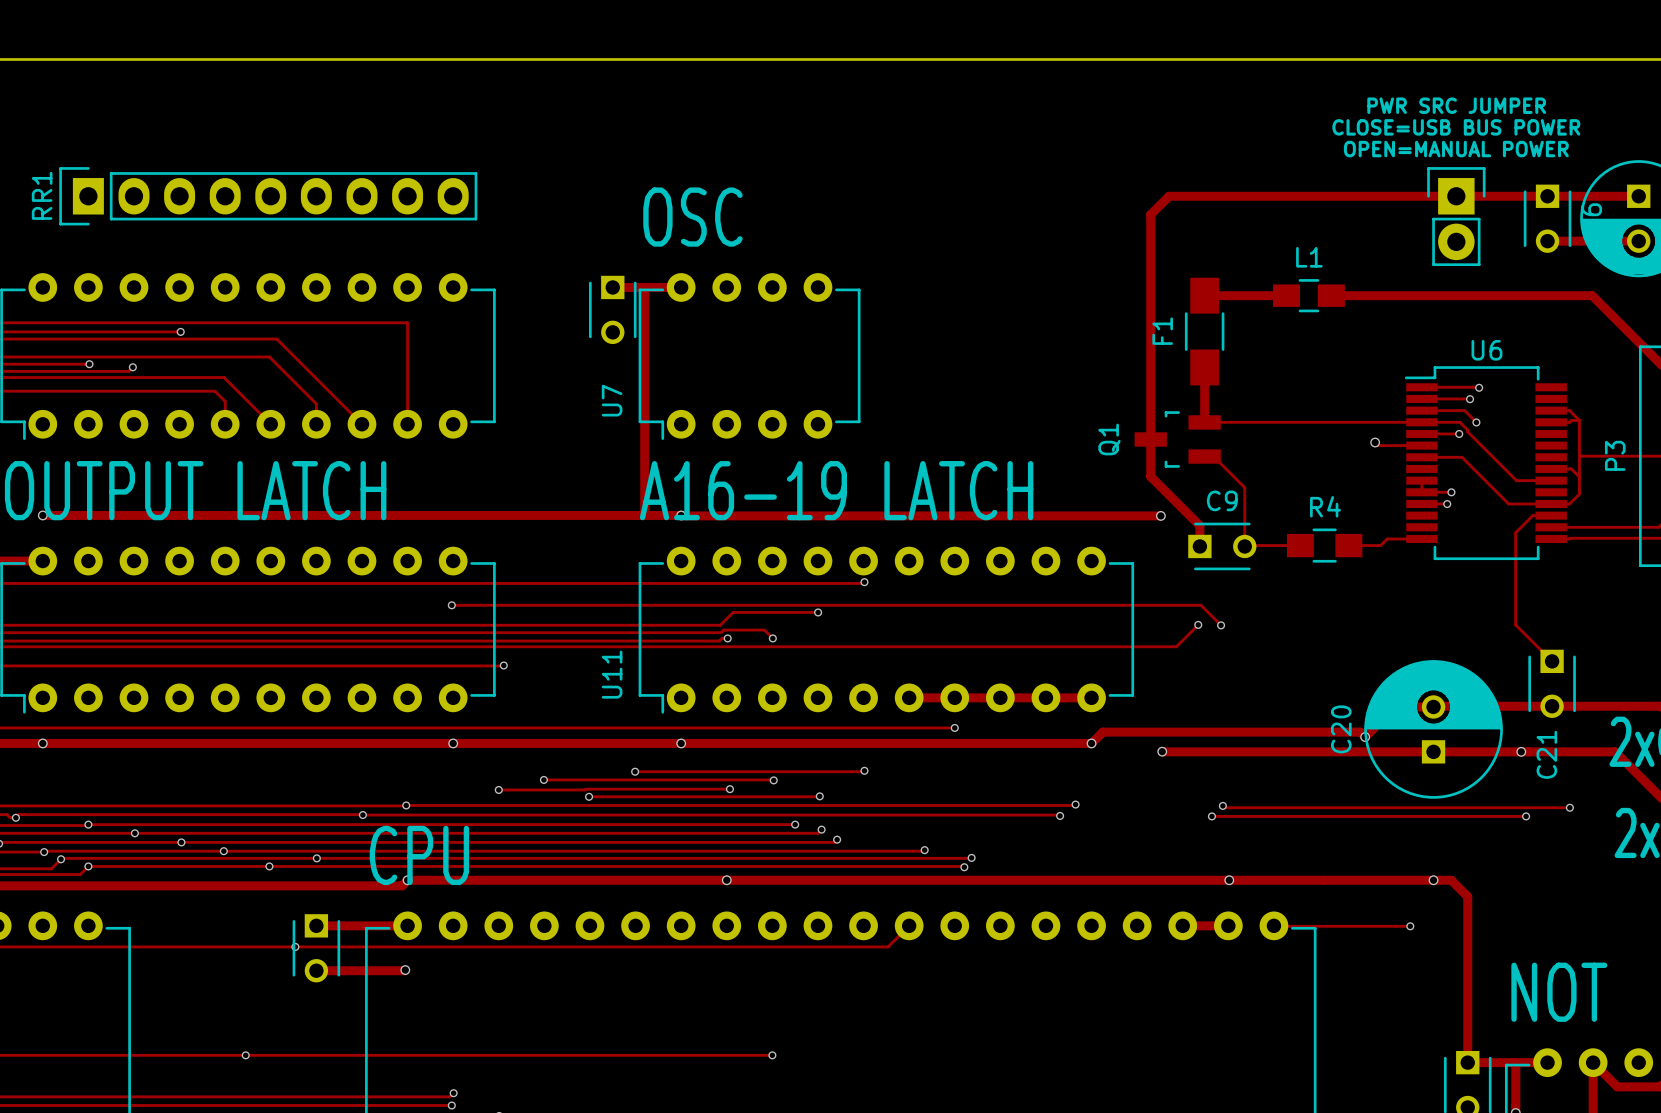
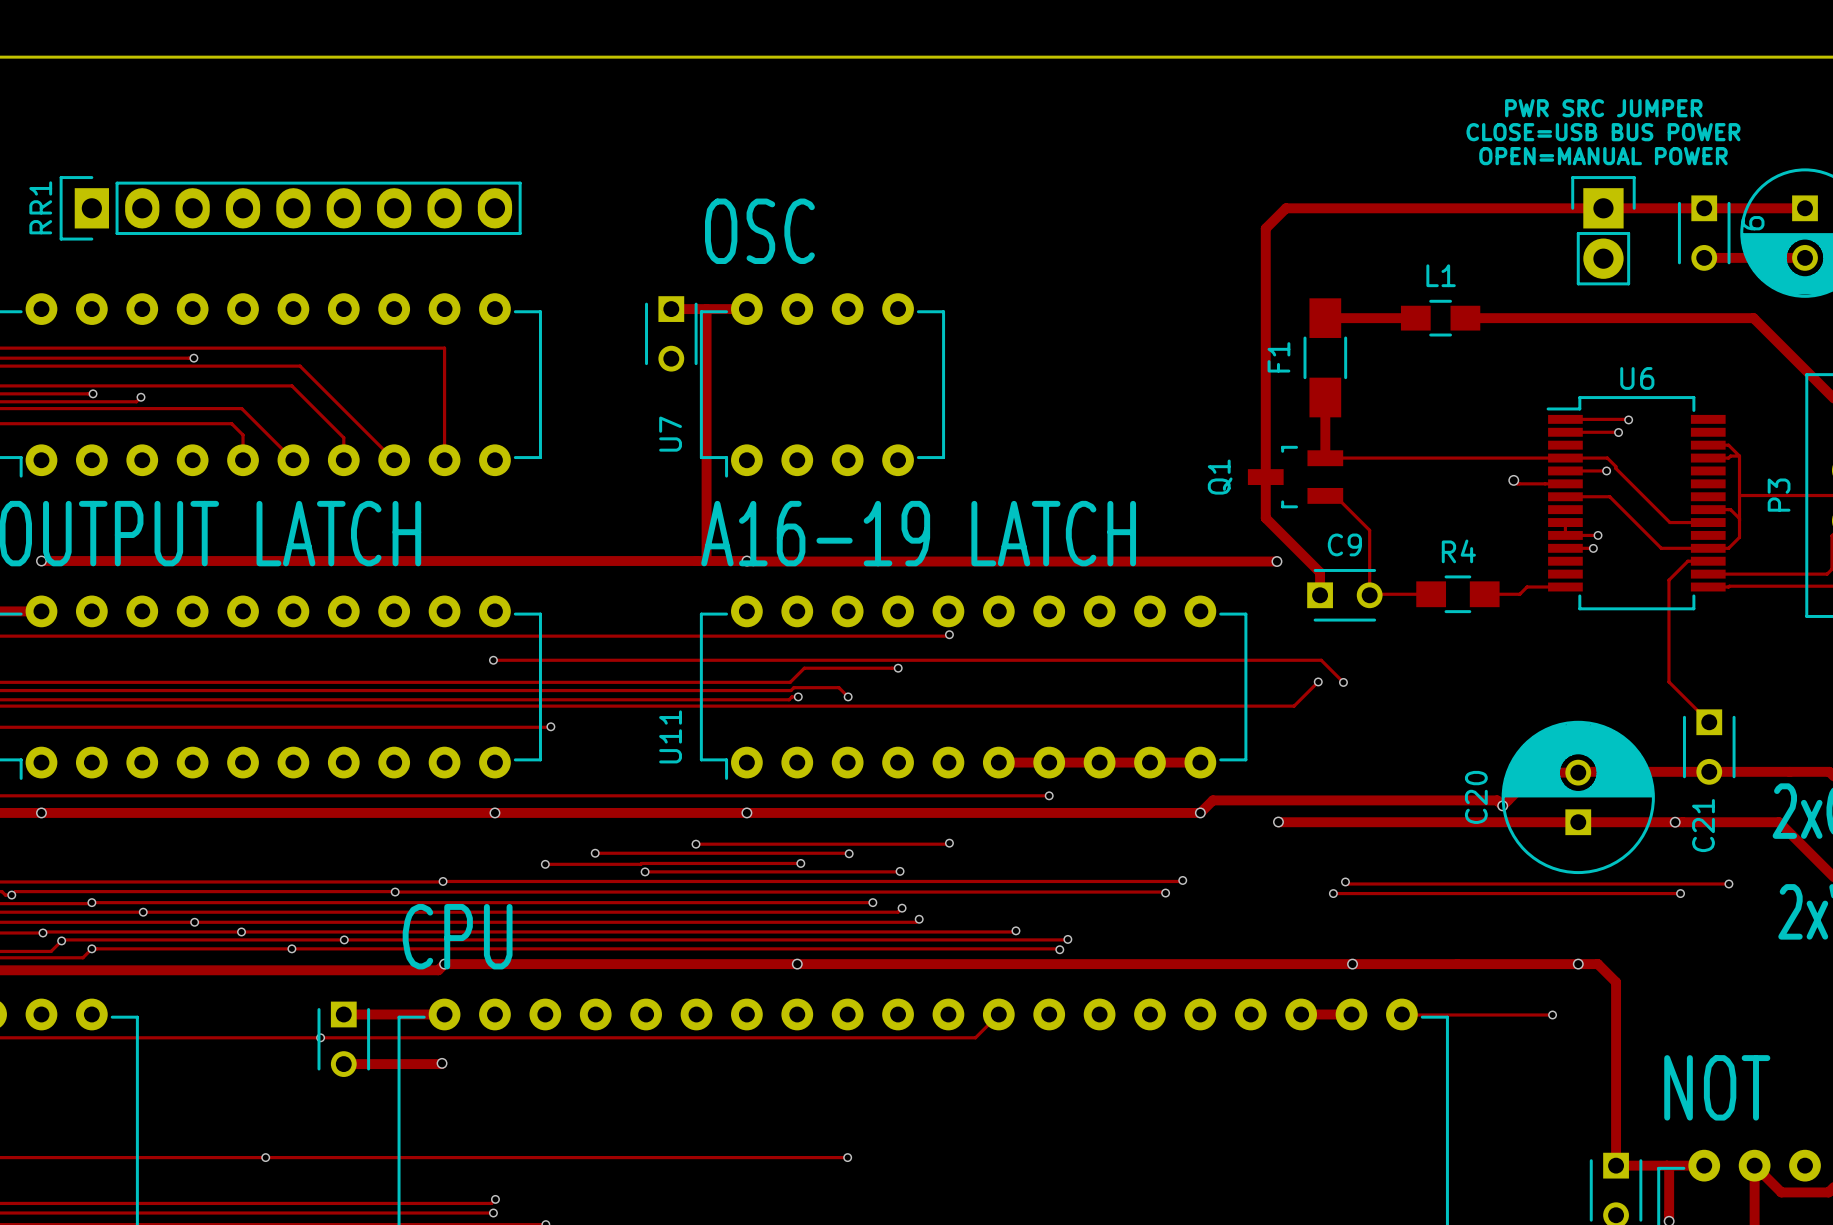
track: (1421, 410) (1464, 410) (1476, 422) -> none
via: (1476, 422) -> none

